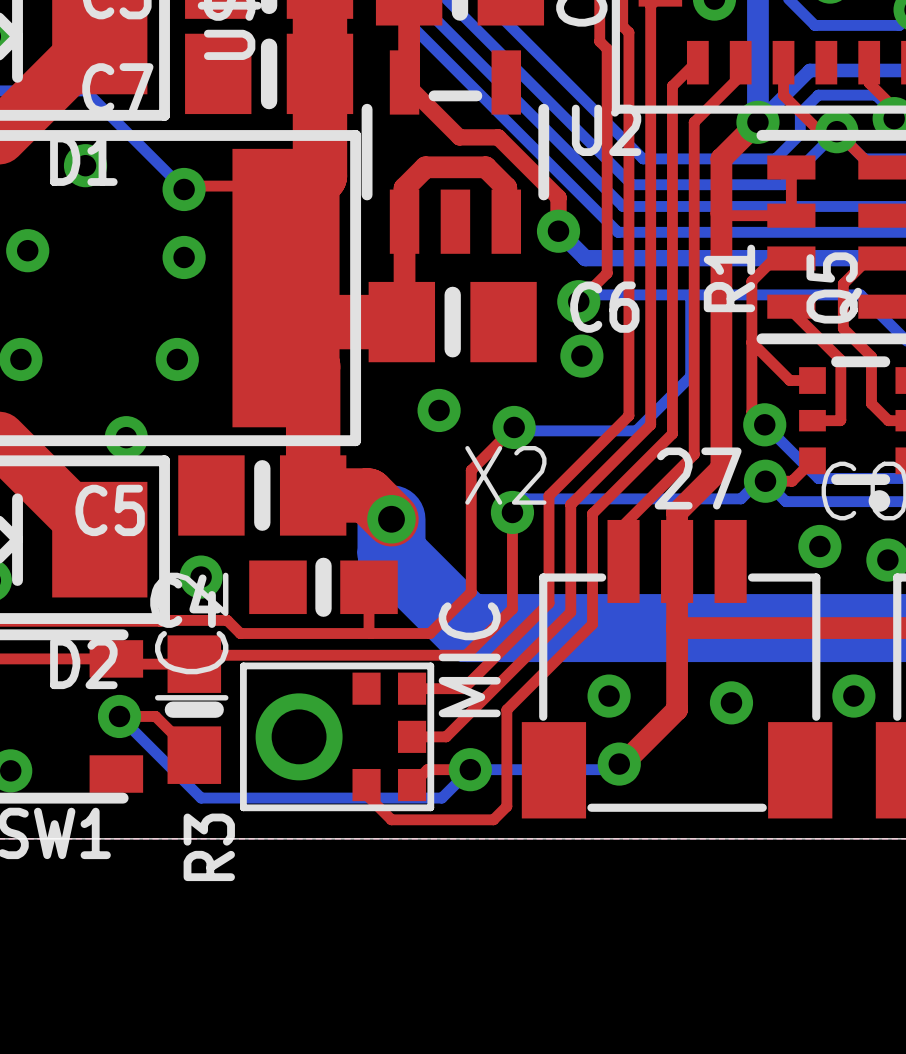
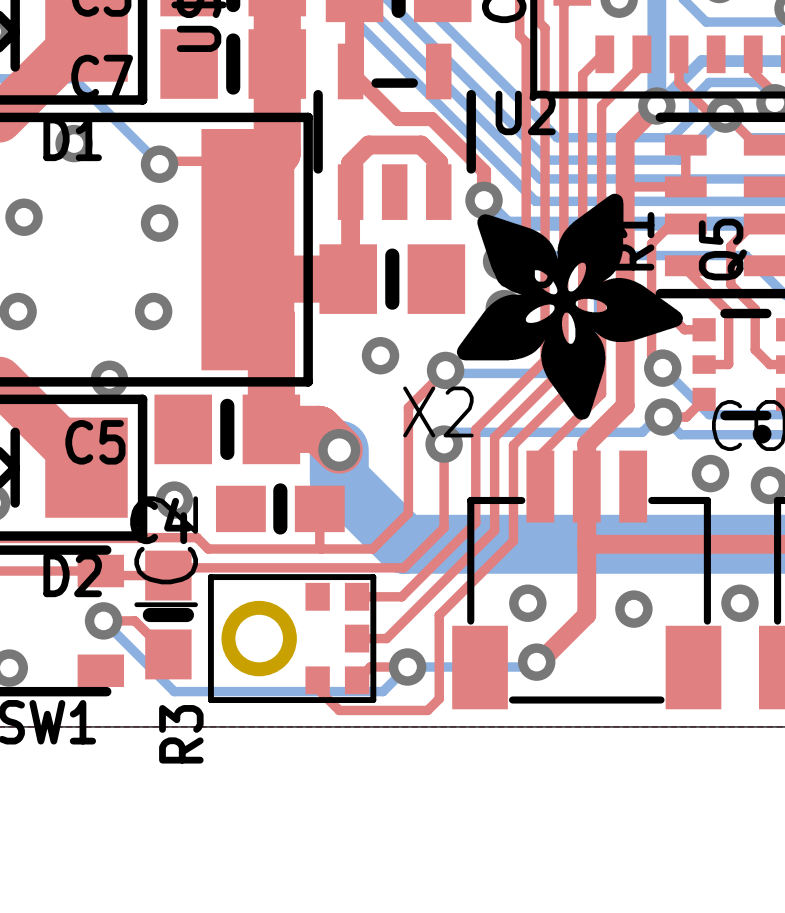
drawing: none -> [456, 193, 683, 420]
text: 27 (698, 478) -> none
text: MIC (469, 659) -> none

